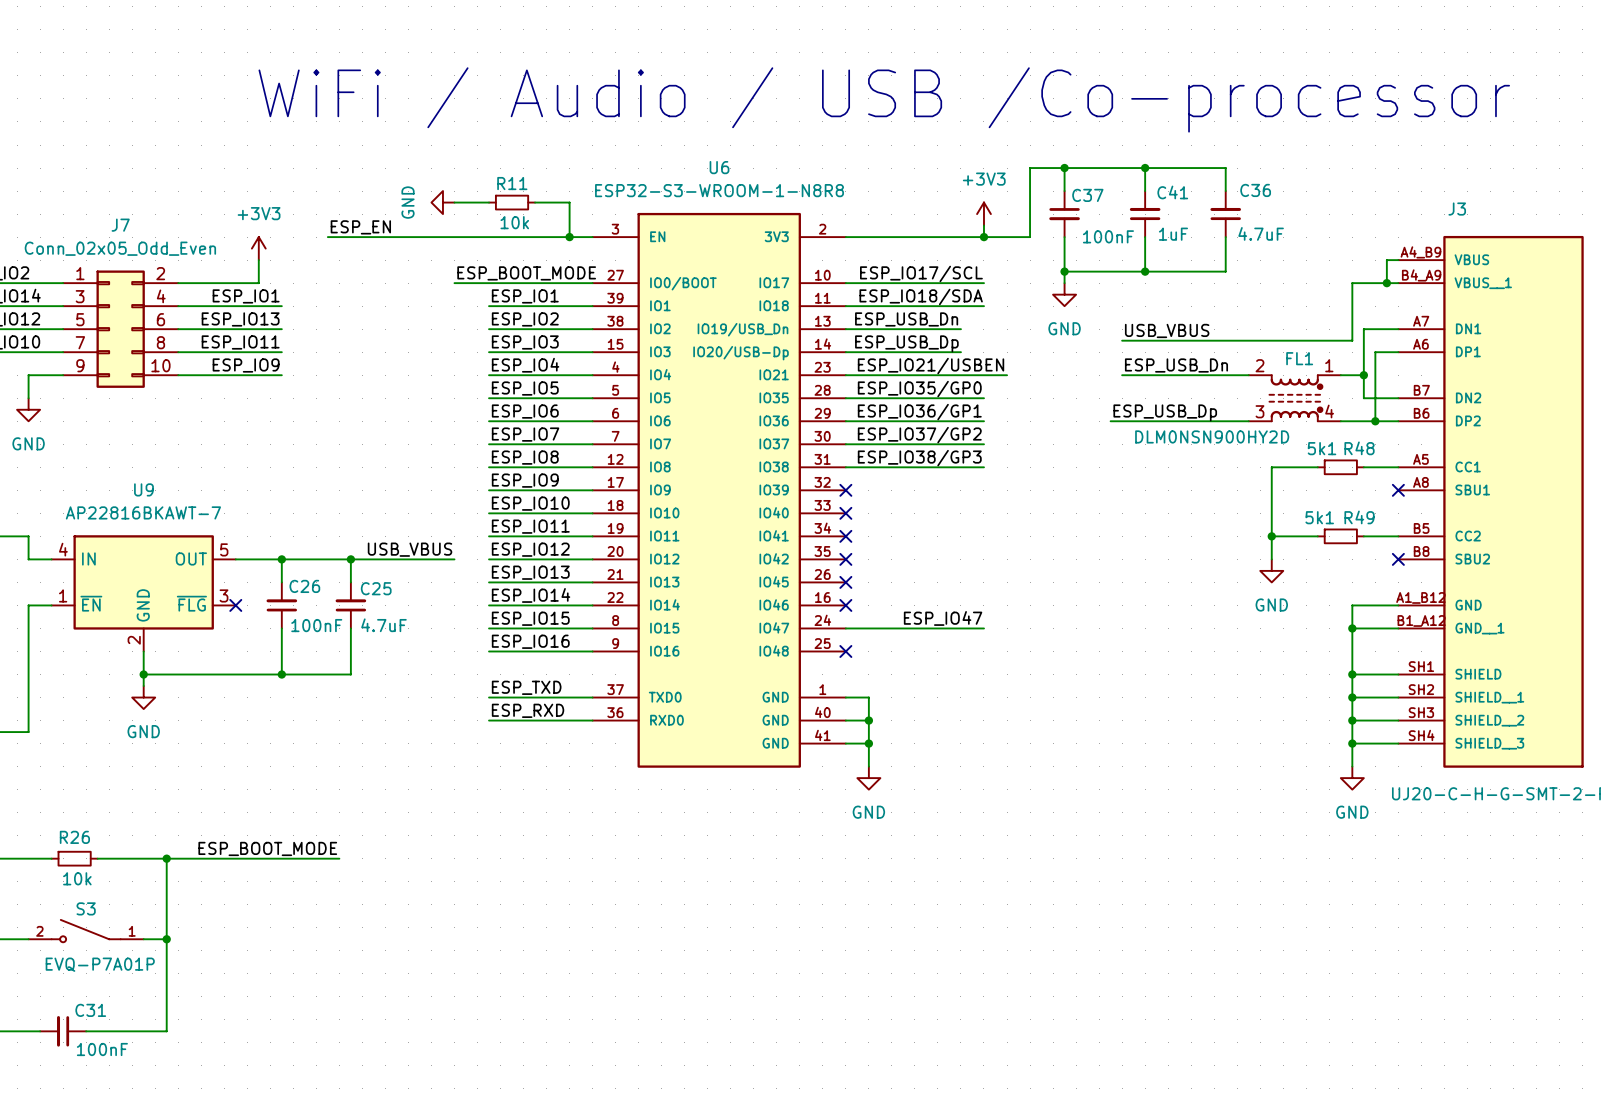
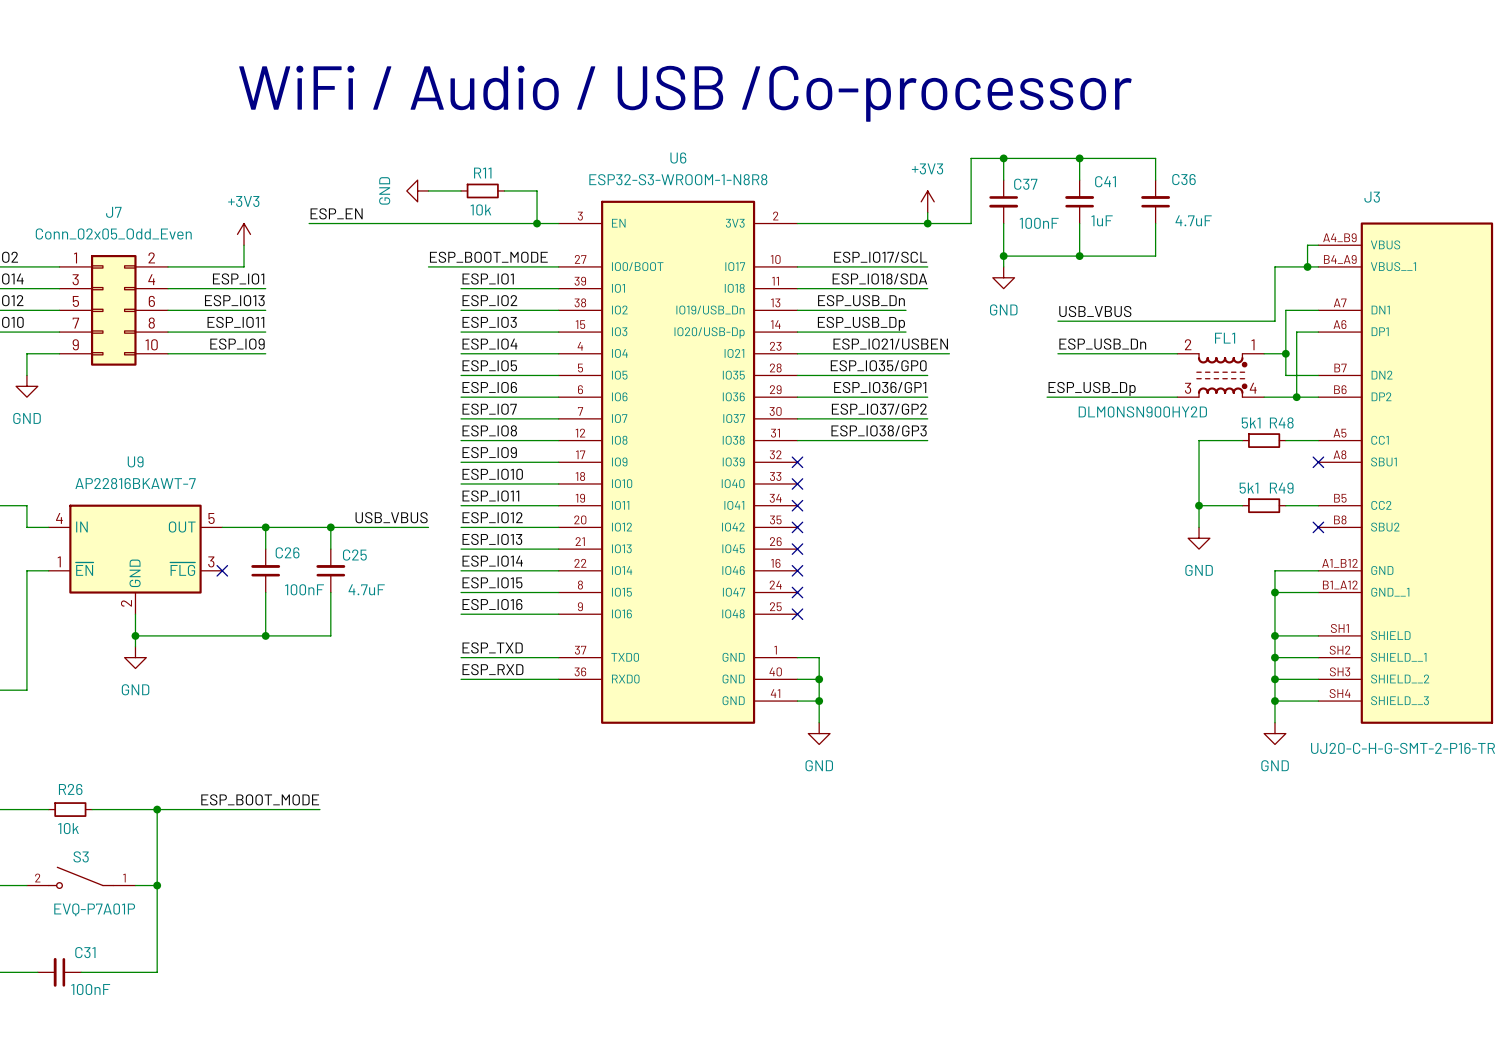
label: ESP_IO47 (943, 618) -> none
wire: (845, 628) (983, 628) -> none
no-connect mark: none -> (797, 592)

